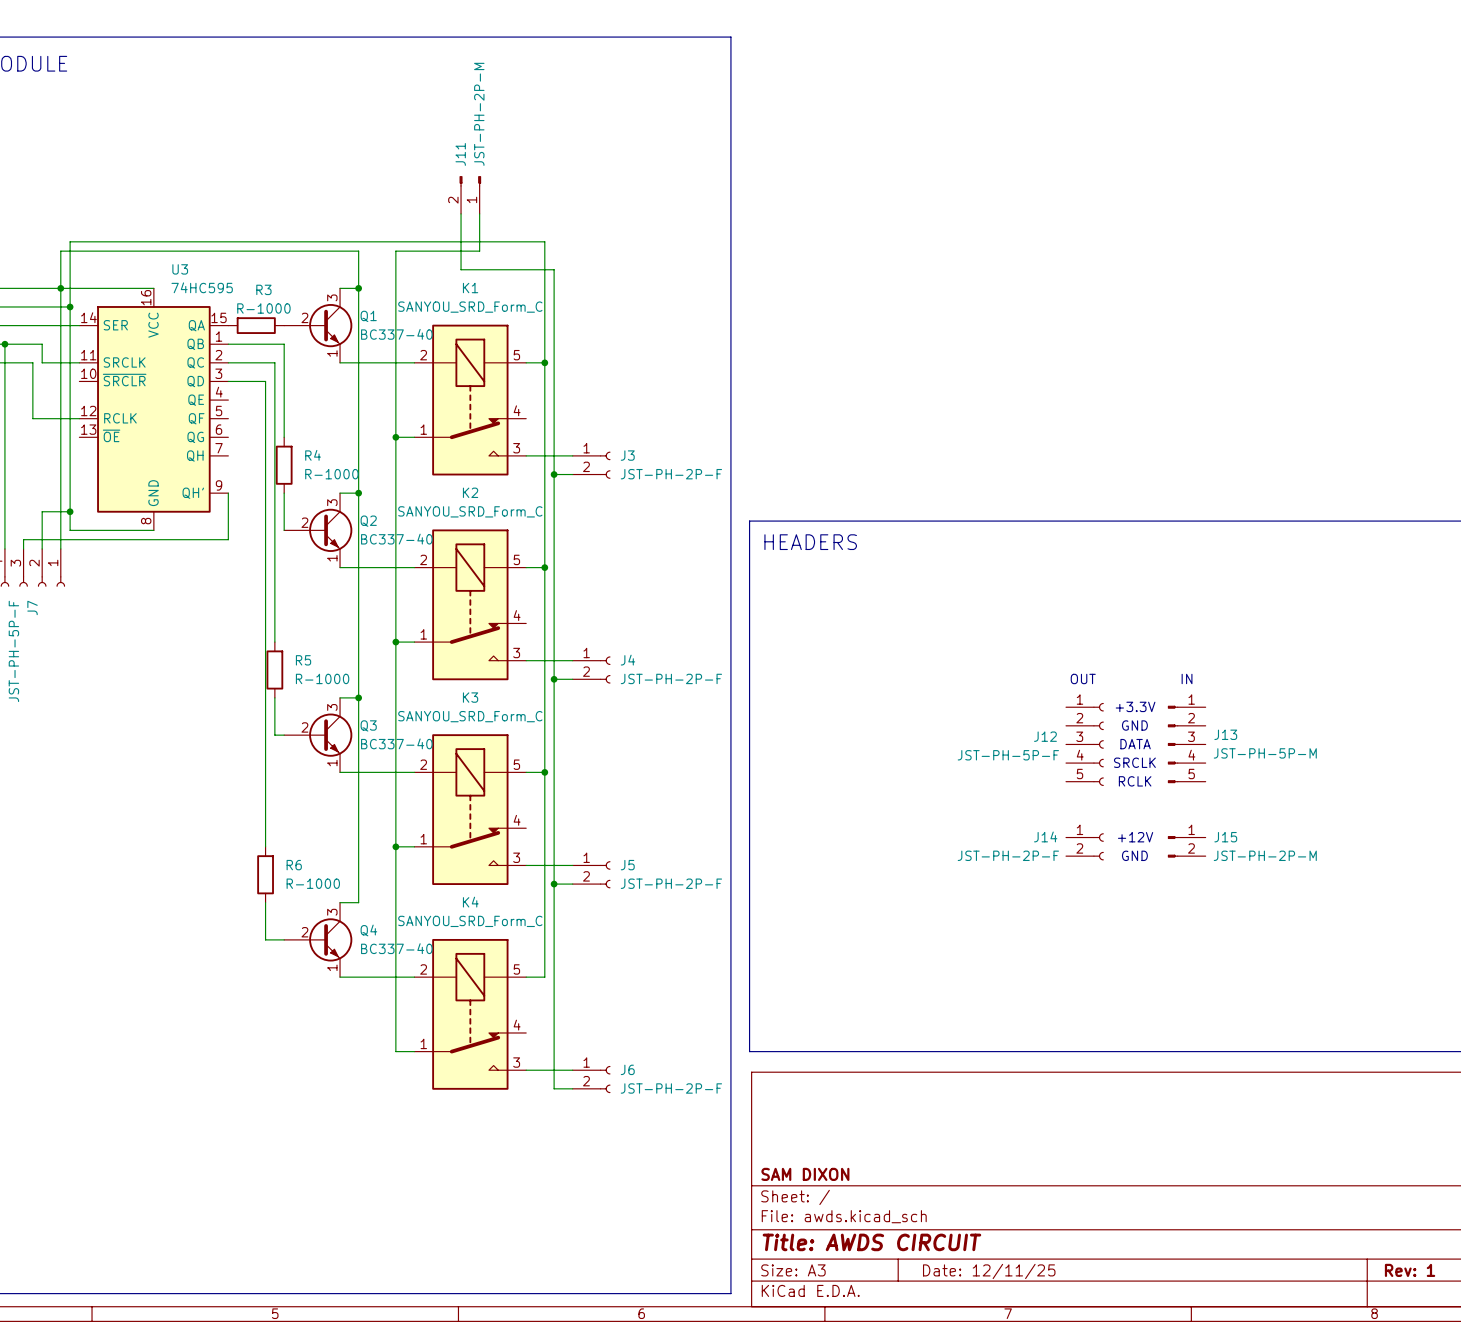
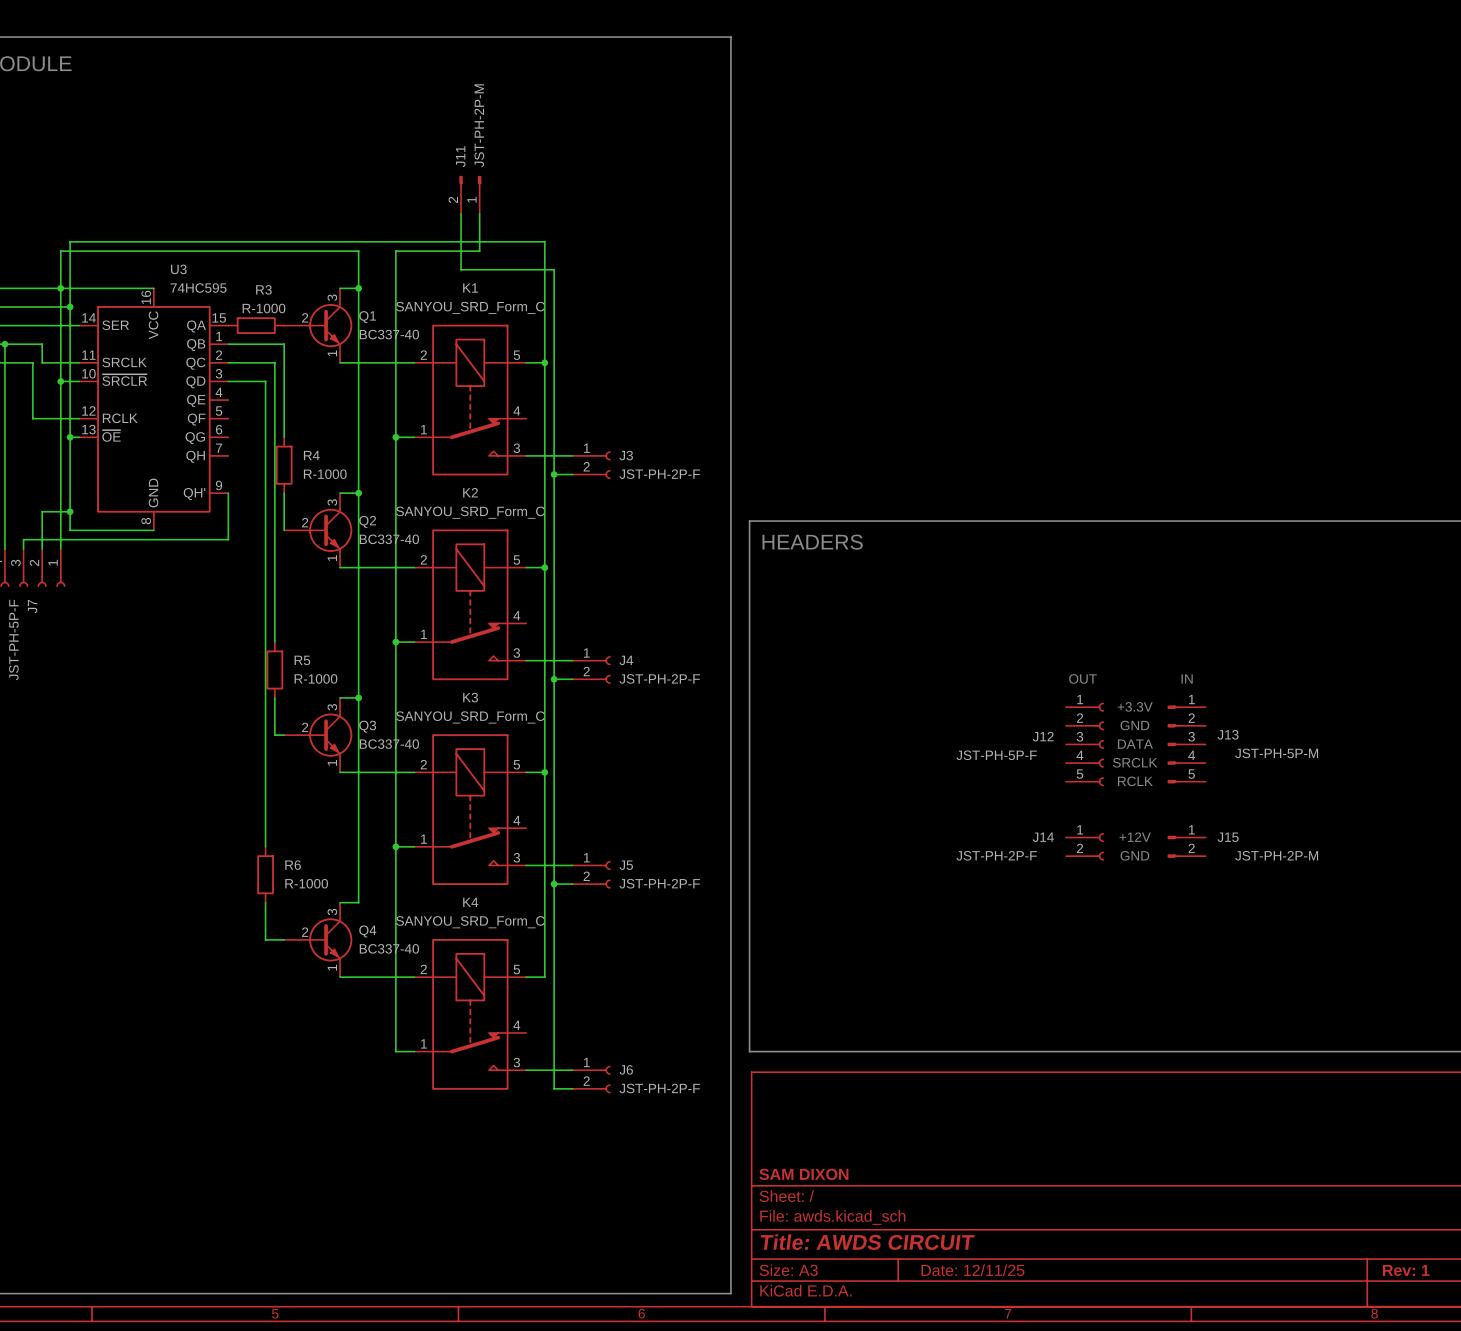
wire: none -> (60, 381) (79, 381)
junction: none -> (60, 381)
wire: none -> (70, 437) (79, 437)
junction: none -> (70, 437)

